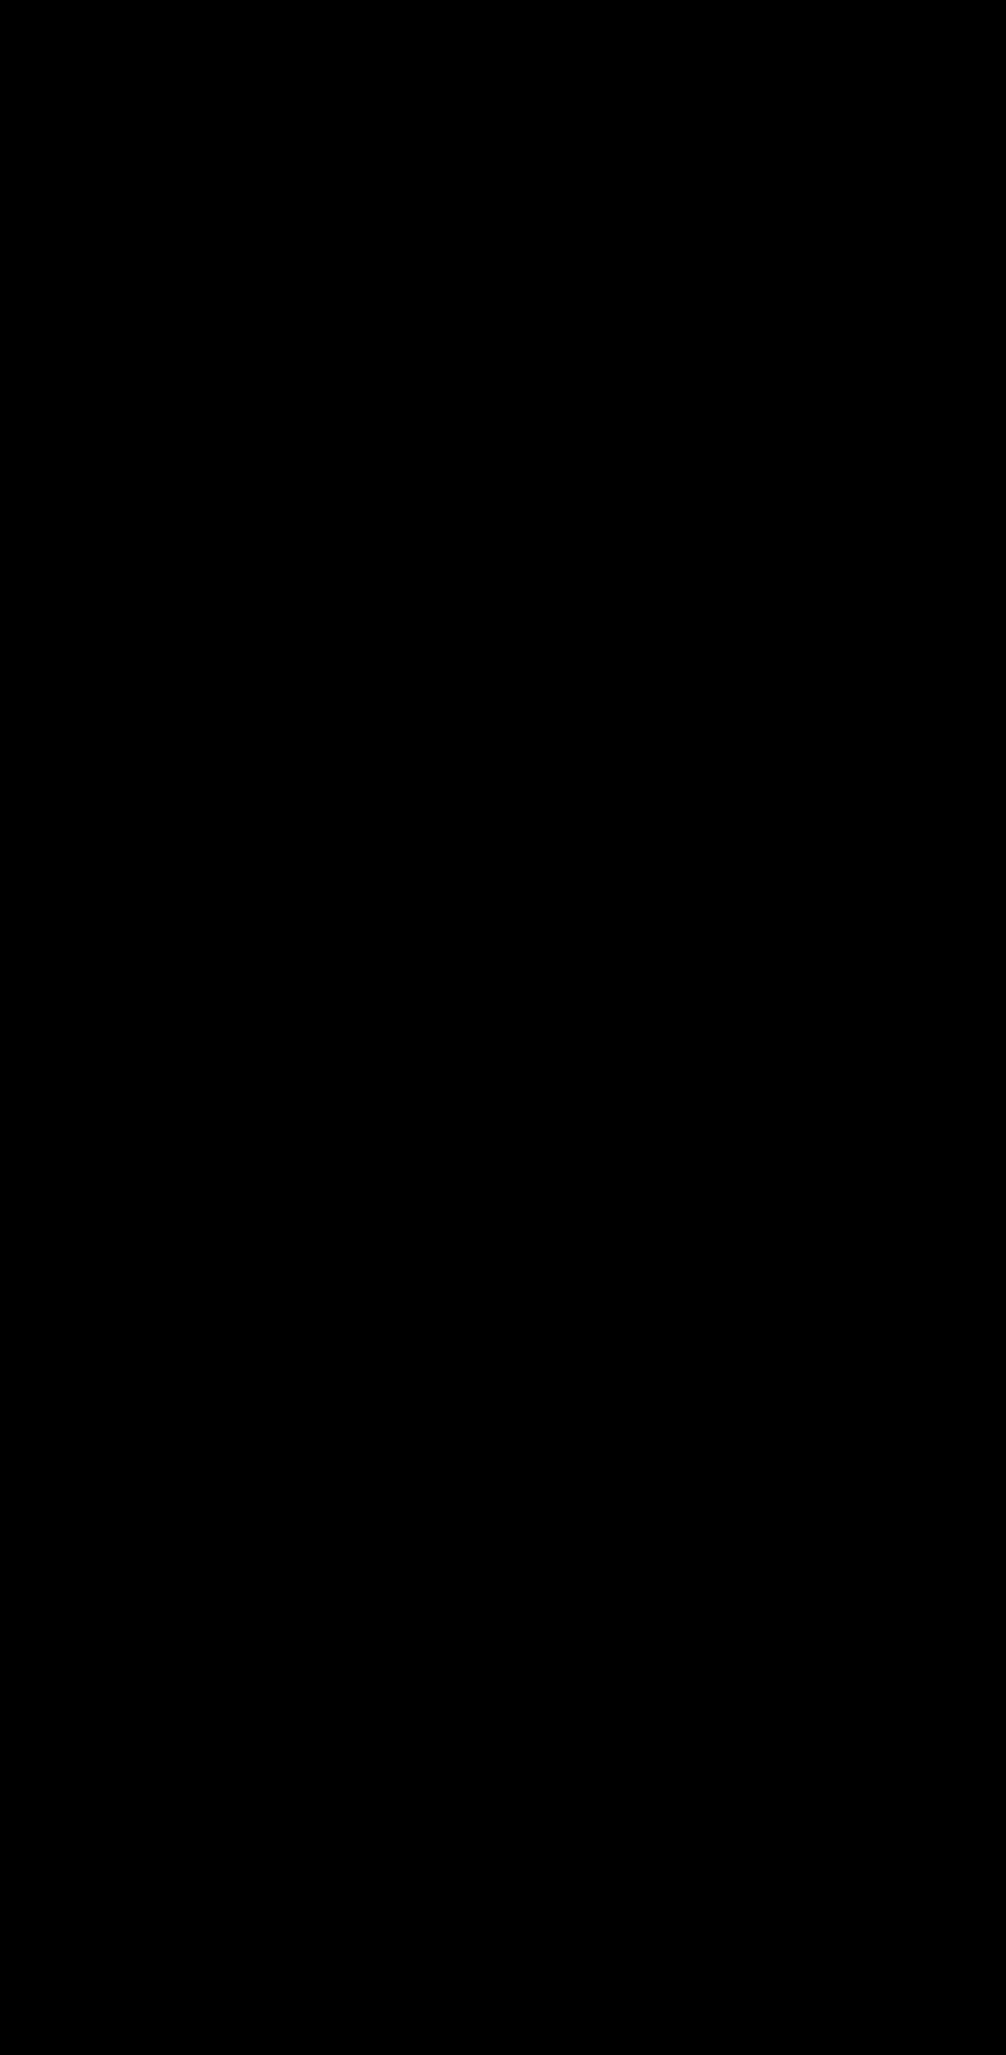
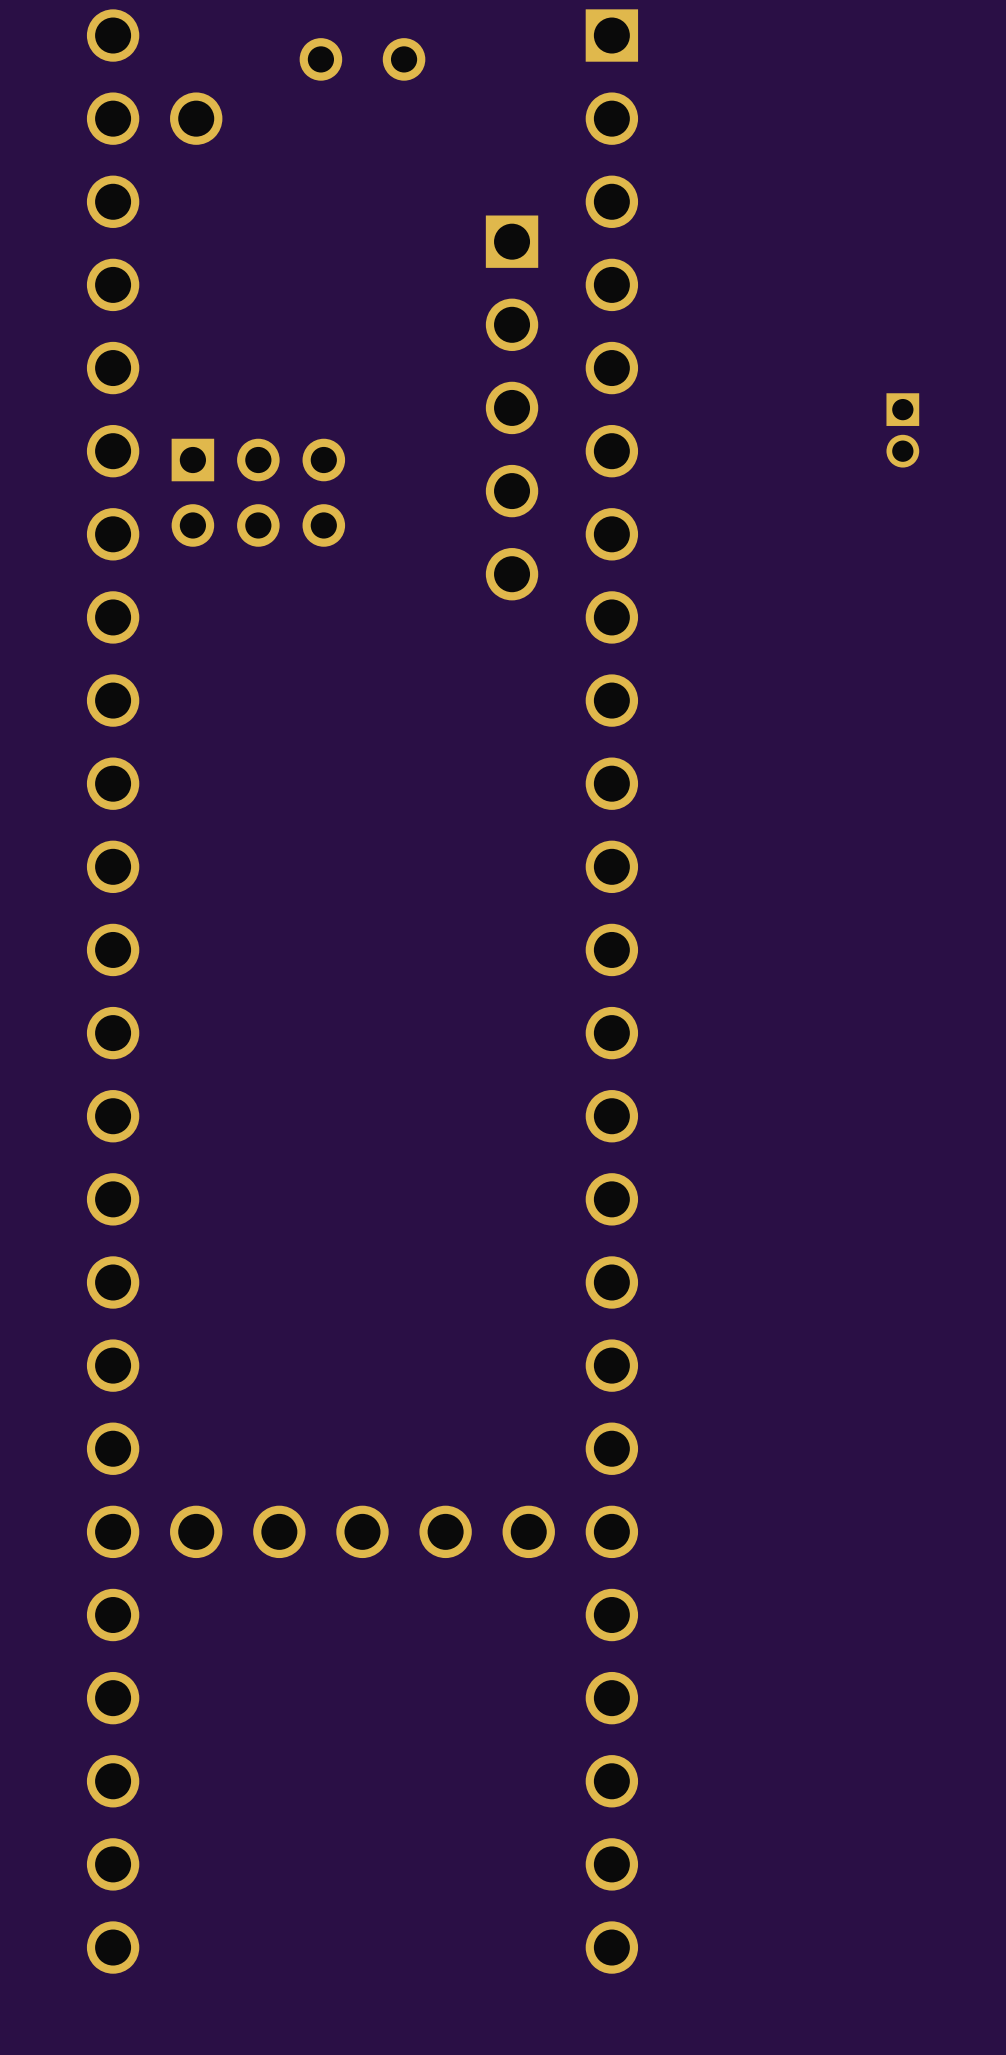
part: none -> (902, 430)
part: none -> (362, 991)

